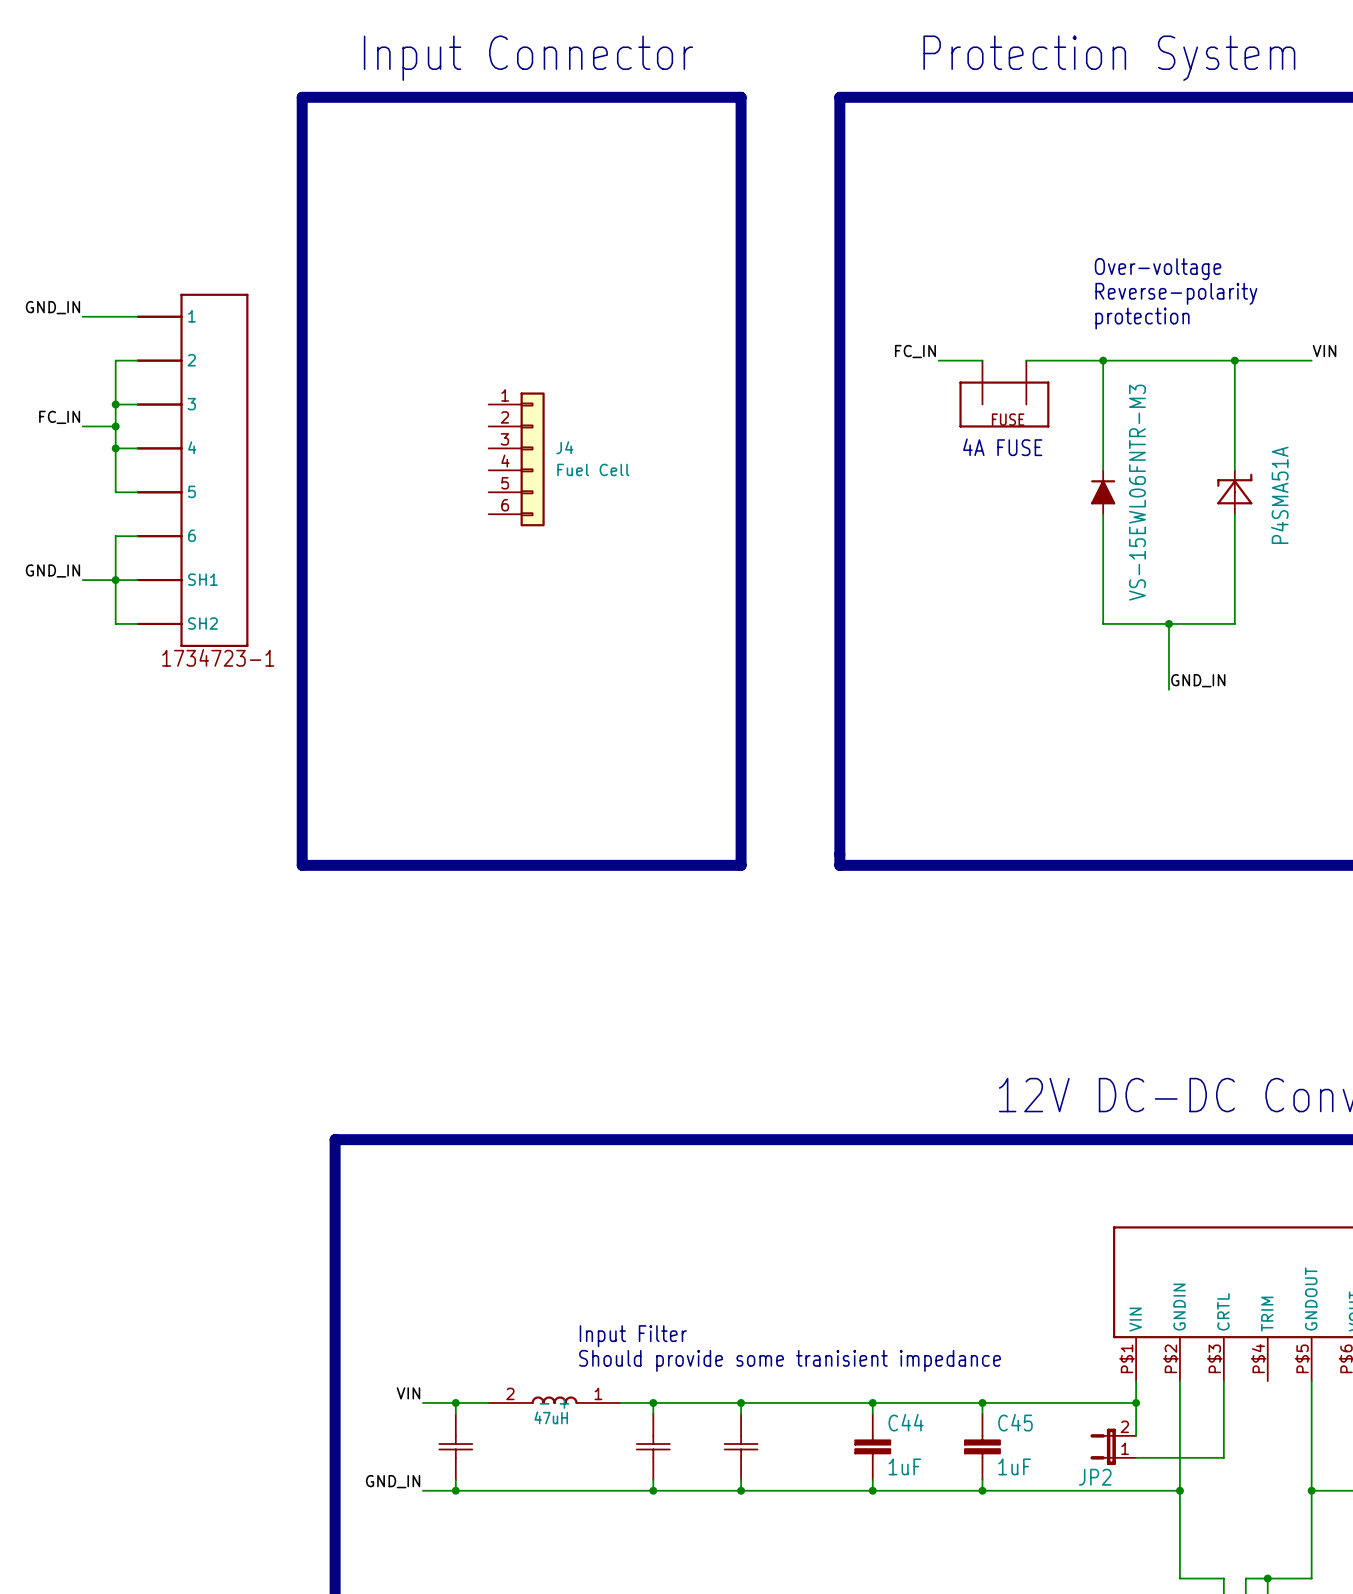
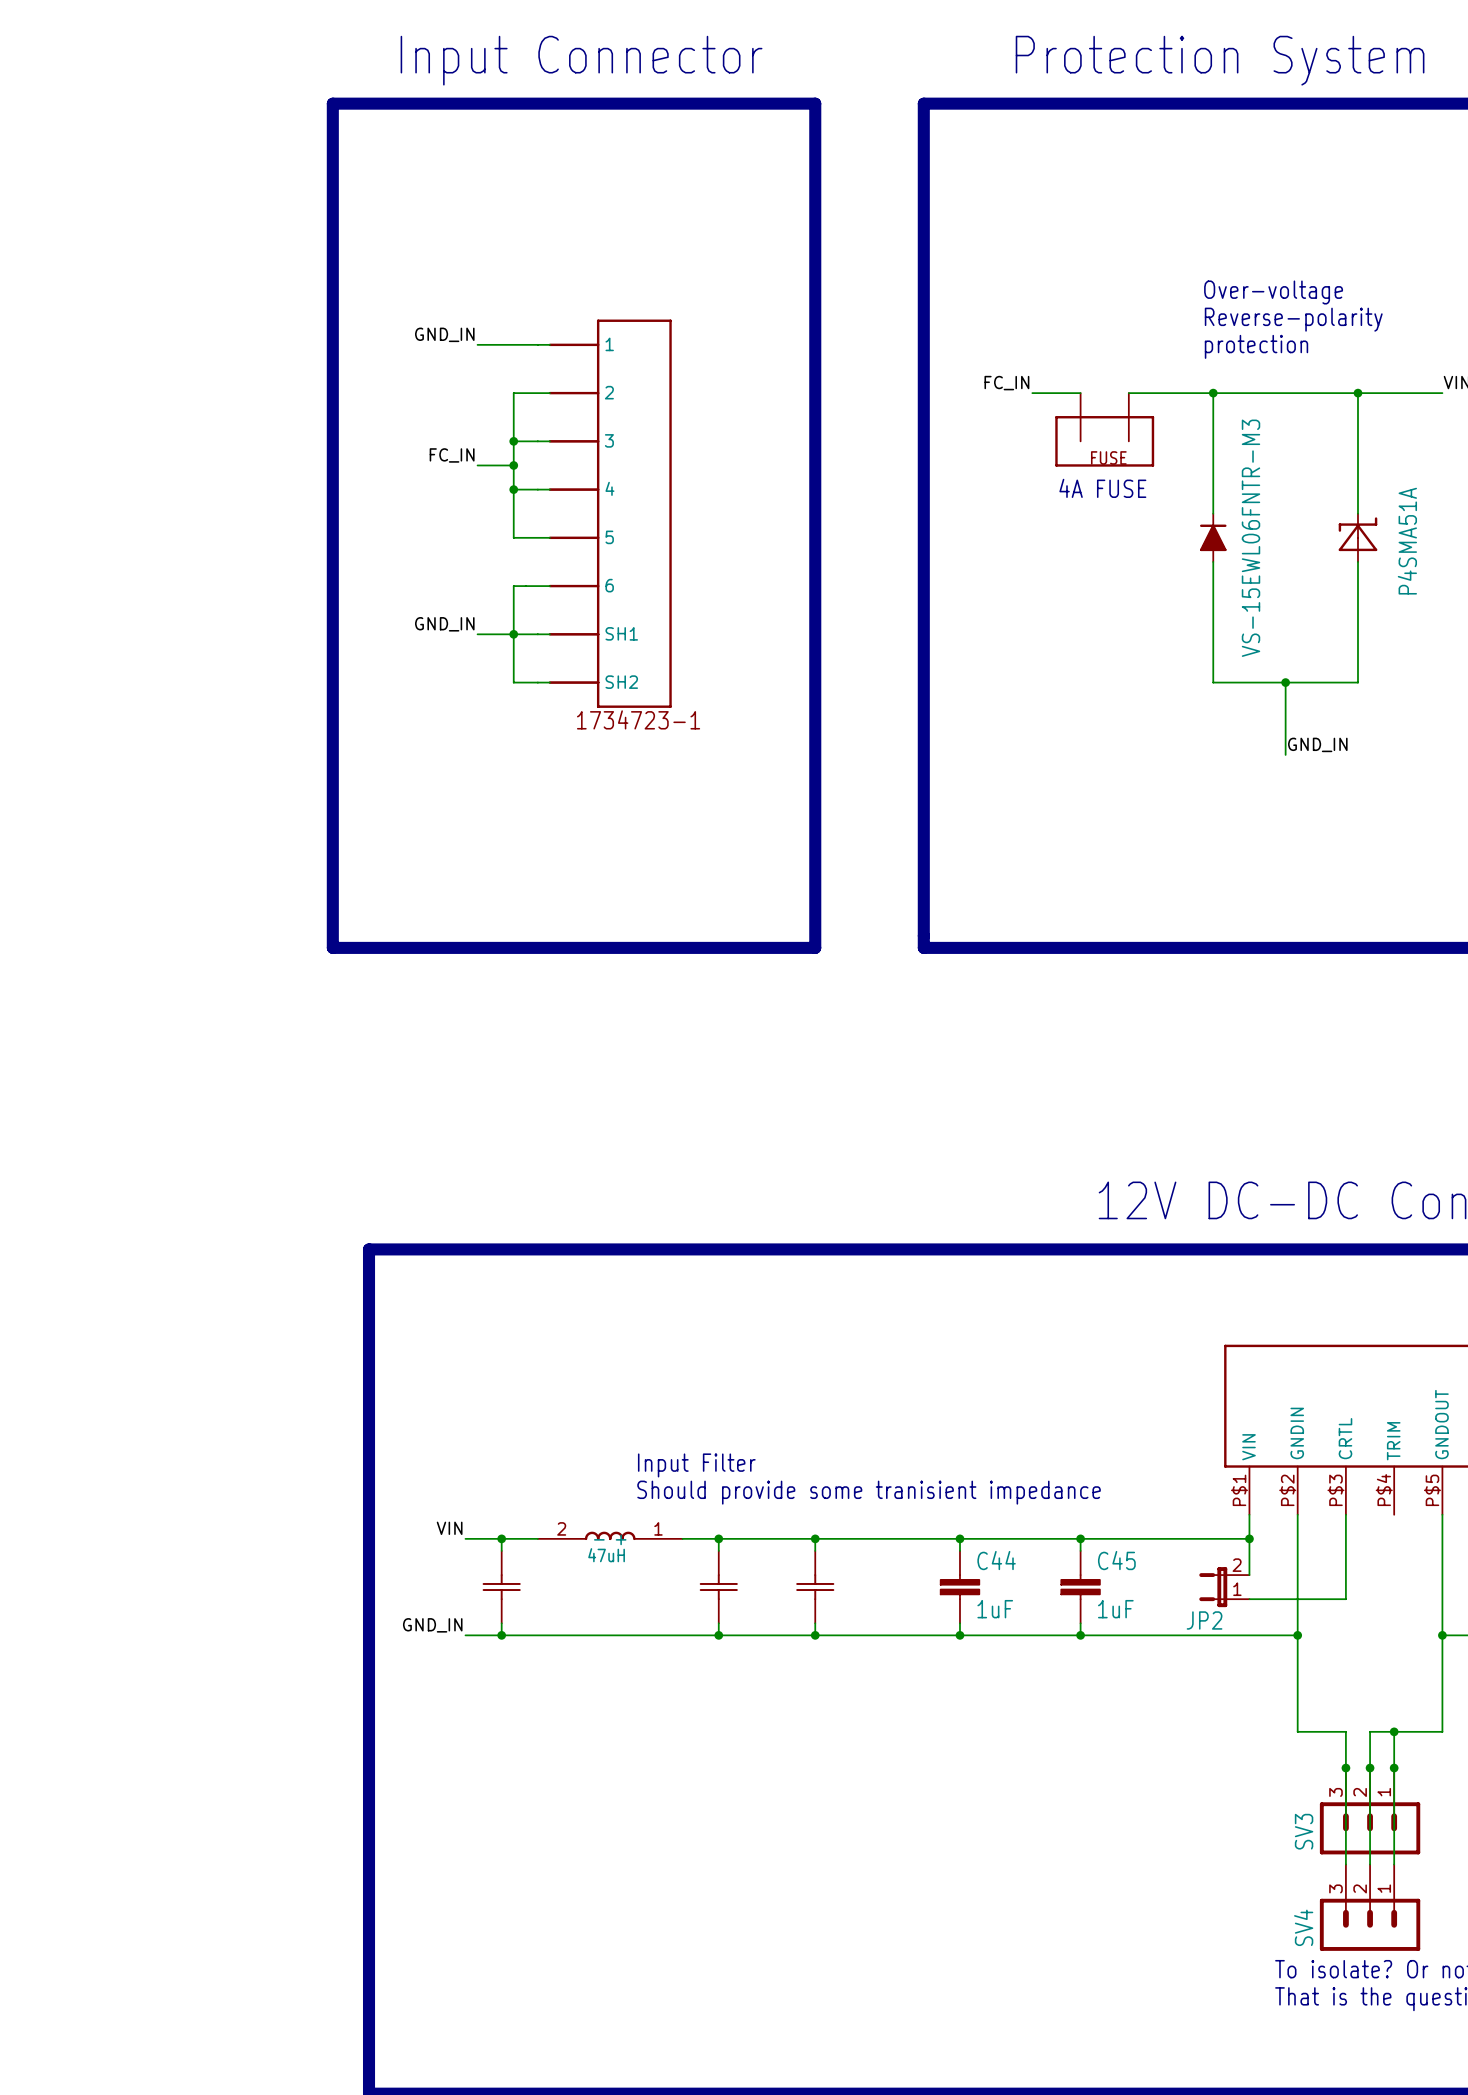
label: GND_IN (52, 307) -> none
label: none -> GND_IN (444, 334)
wire: (82, 316) (137, 316) -> none
wire: none -> (477, 344) (549, 344)
wire: (137, 360) (115, 360) (115, 492) (137, 492) -> none
wire: none -> (549, 393) (513, 393) (513, 537) (549, 537)
wire: (115, 404) (137, 404) -> none
junction: (115, 404) -> none
wire: none -> (513, 441) (549, 441)
junction: none -> (513, 441)
label: FC_IN (59, 417) -> none
label: none -> FC_IN (452, 455)
wire: (82, 426) (115, 426) -> none
junction: (115, 426) -> none
wire: none -> (477, 465) (513, 465)
junction: none -> (513, 465)
wire: (115, 448) (137, 448) -> none
junction: (115, 448) -> none
wire: none -> (513, 489) (549, 489)
junction: none -> (513, 489)
J4: Fuel Cell (516, 459) -> none
part: (192, 470) -> none
part: none -> (610, 513)
wire: (137, 536) (115, 536) (115, 623) (137, 623) -> none
wire: none -> (549, 586) (513, 586) (513, 682) (549, 682)
label: GND_IN (52, 570) -> none
label: none -> GND_IN (444, 624)
wire: (82, 580) (137, 580) -> none
junction: (115, 580) -> none
wire: none -> (477, 634) (549, 634)
junction: none -> (513, 634)

